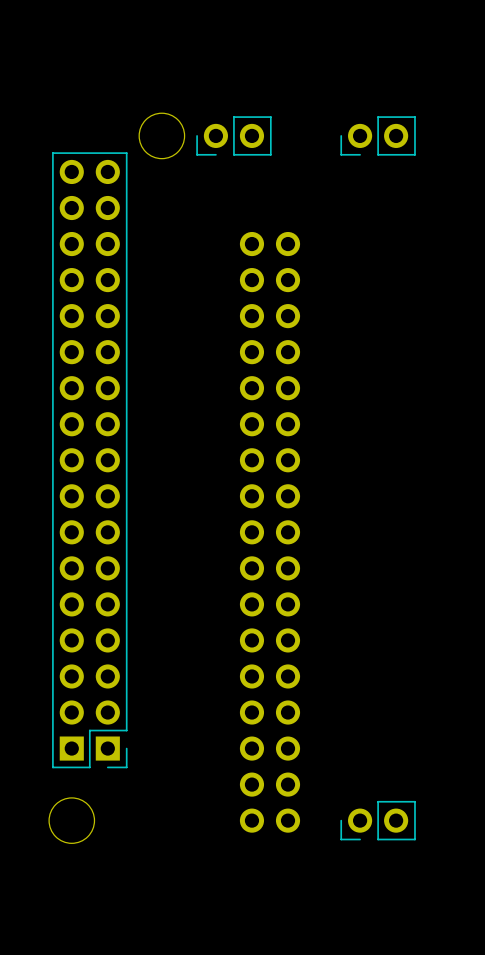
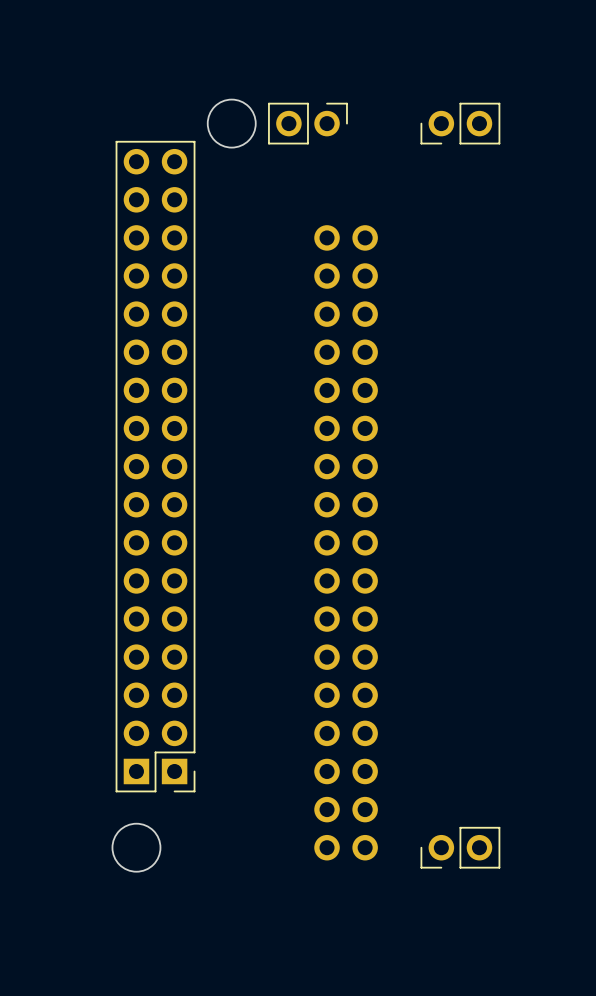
part rotation: 0° (233, 135) -> 180° (307, 123)

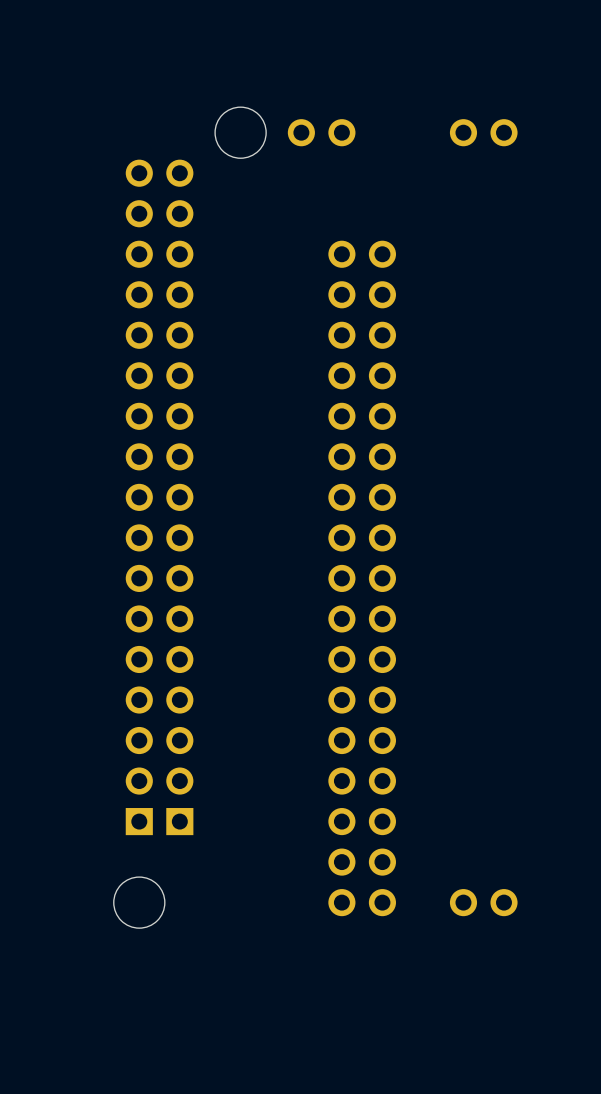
part side: bottom (307, 123) -> top (321, 132)
part side: bottom (460, 123) -> top (483, 132)
part side: bottom (155, 466) -> top (159, 497)
part side: bottom (460, 847) -> top (483, 902)

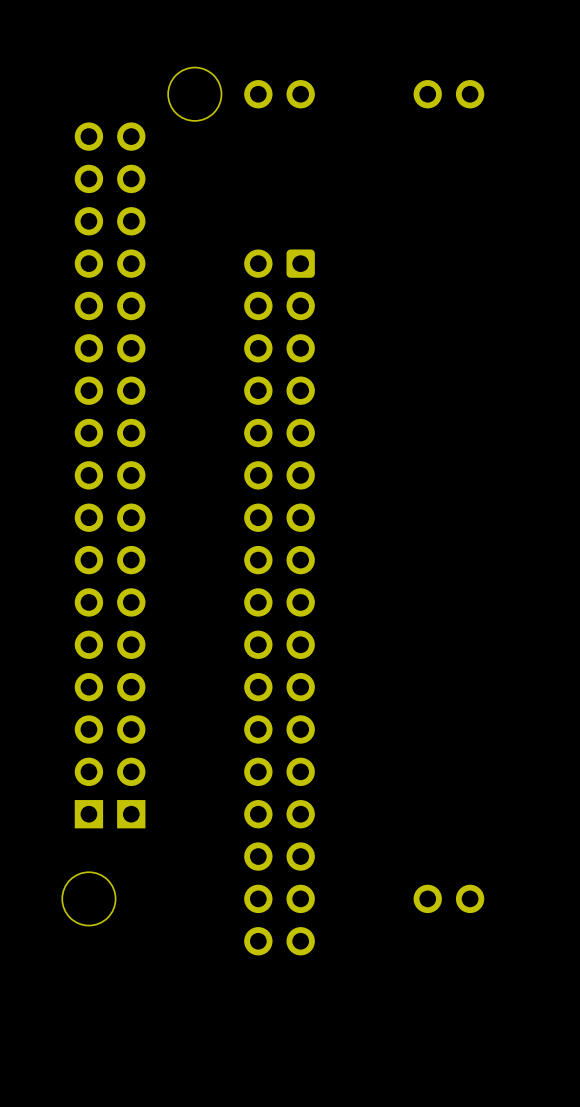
part: (362, 578) -> none
part: none -> (279, 602)

